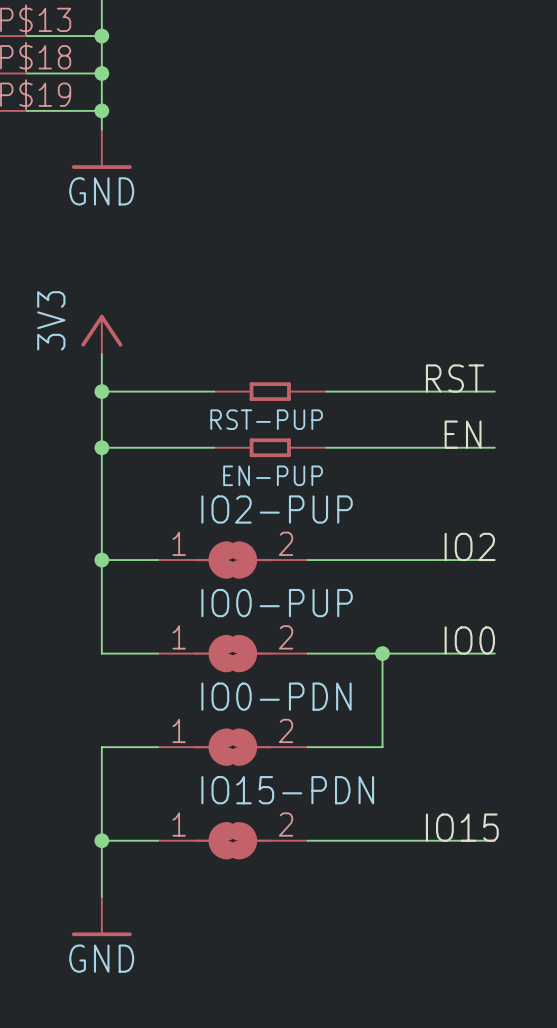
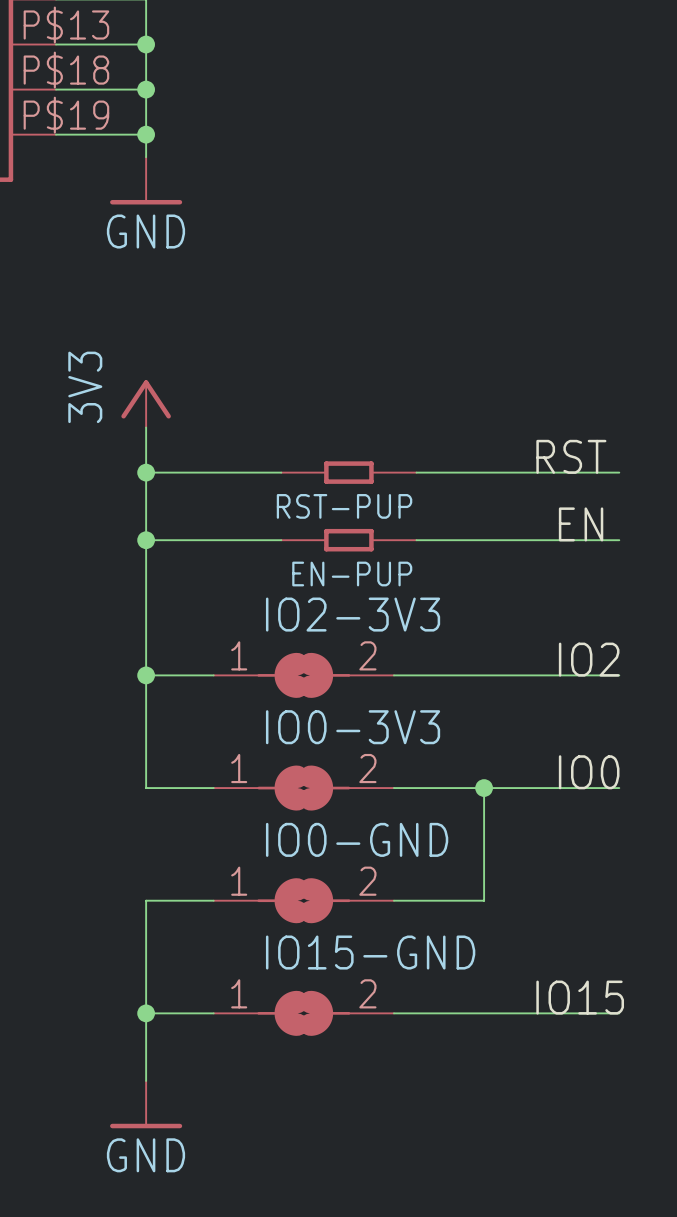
IO2-PUP name: IO2-PUP (277, 509) -> IO2-3V3 (353, 614)
IO0-PUP name: IO0-PUP (277, 603) -> IO0-3V3 (353, 727)
IO0-PDN name: IO0-PDN (276, 696) -> IO0-GND (357, 839)
IO15-PDN name: IO15-PDN (287, 790) -> IO15-GND (370, 952)

